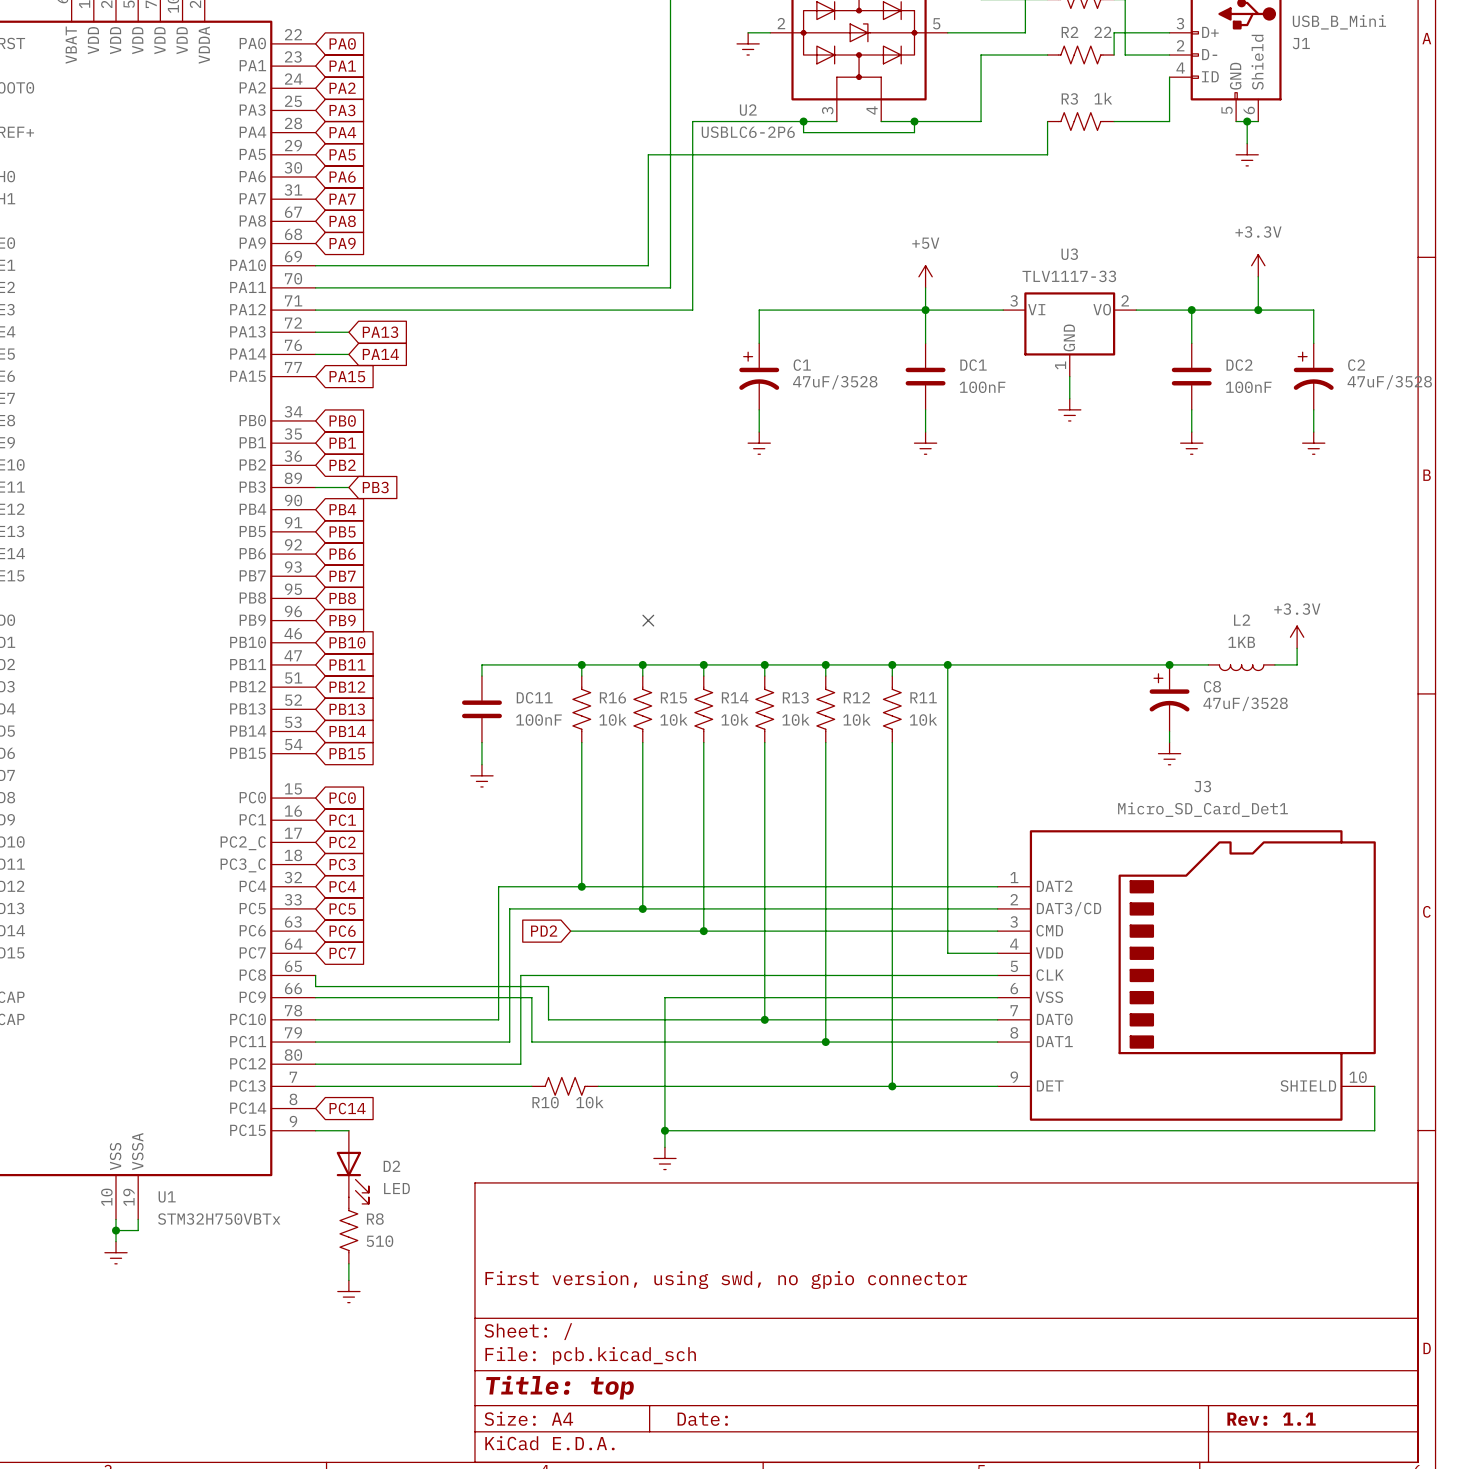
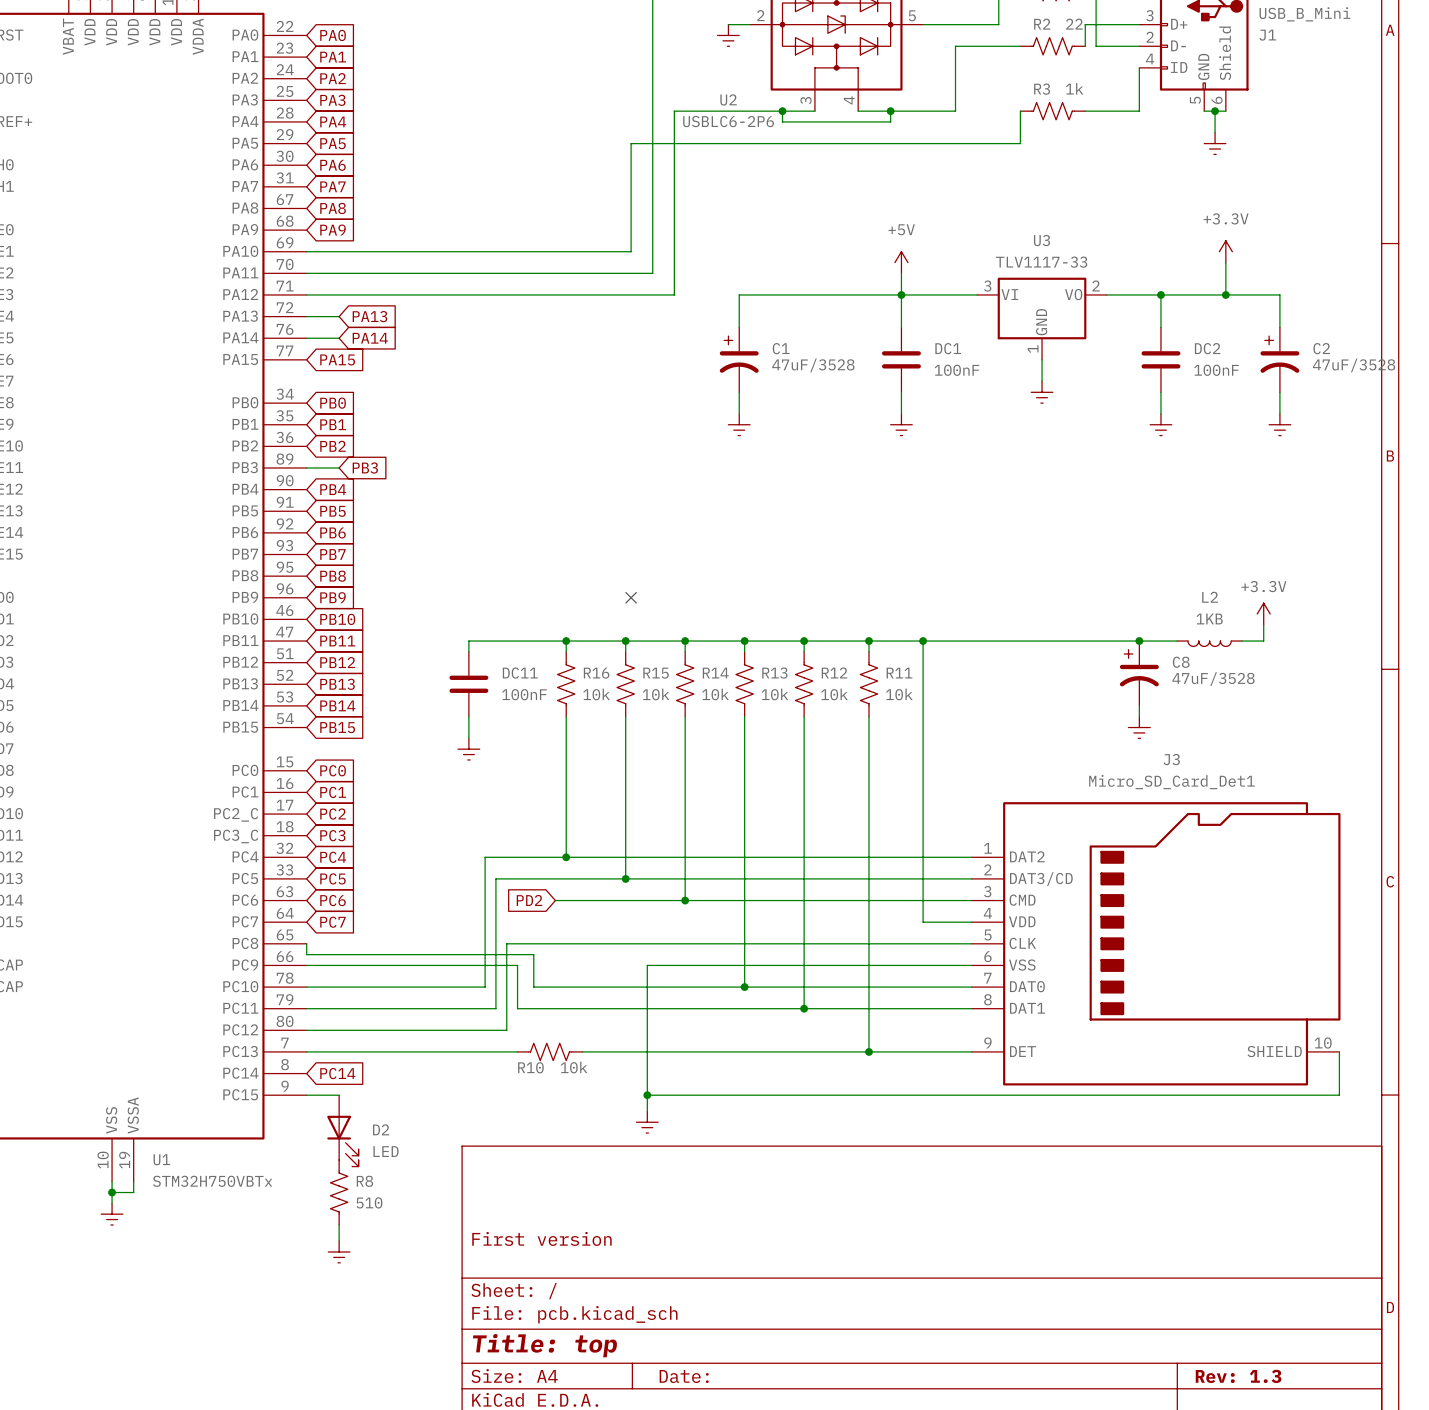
title block: First version, using swd, no gpio connector (726, 1280) -> First version (541, 1238)
title block: Rev: 1.1 (1271, 1419) -> Rev: 1.3 (1238, 1376)

